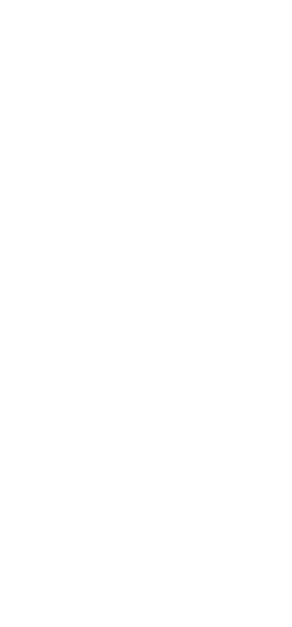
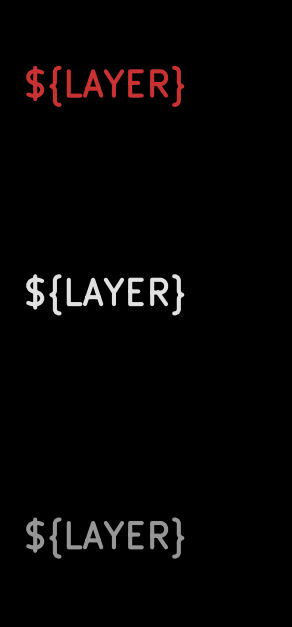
text: none -> ${LAYER} (105, 86)
text: none -> ${LAYER} (105, 294)
text: none -> ${LAYER} (105, 538)

